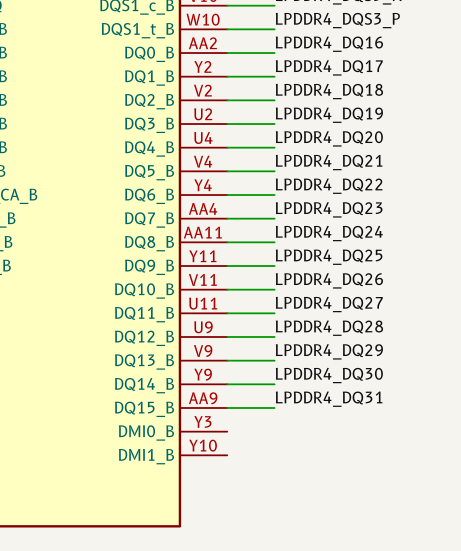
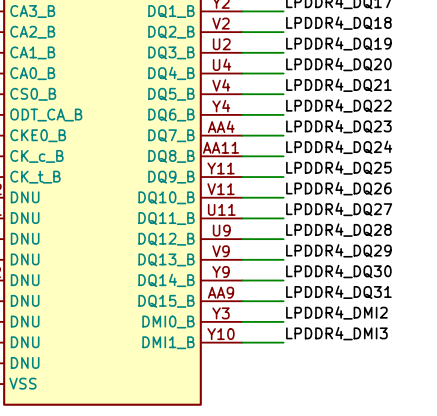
label: none -> LPDDR4_DMI2 (336, 312)
wire: none -> (242, 321) (283, 321)
label: none -> LPDDR4_DMI3 (336, 333)
wire: none -> (242, 342) (283, 342)

